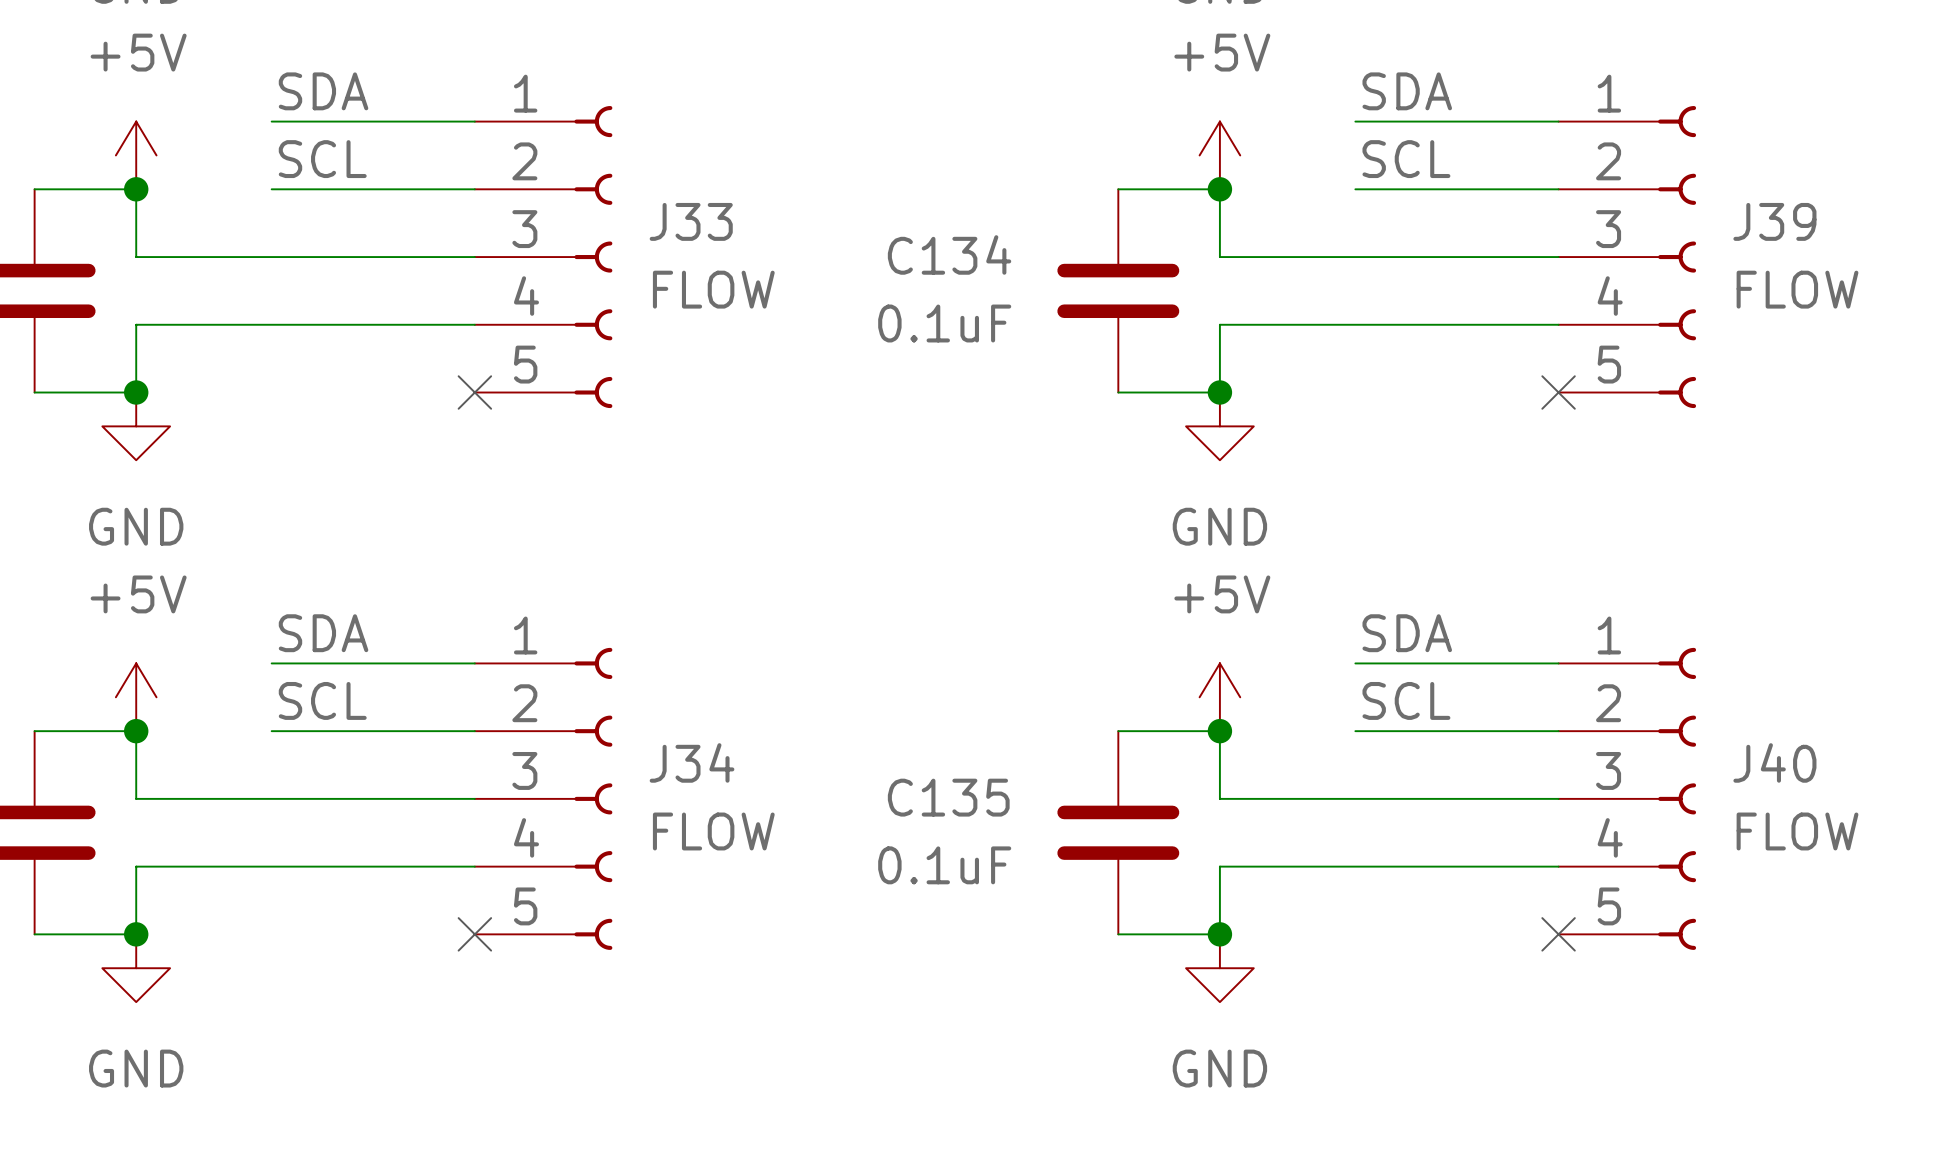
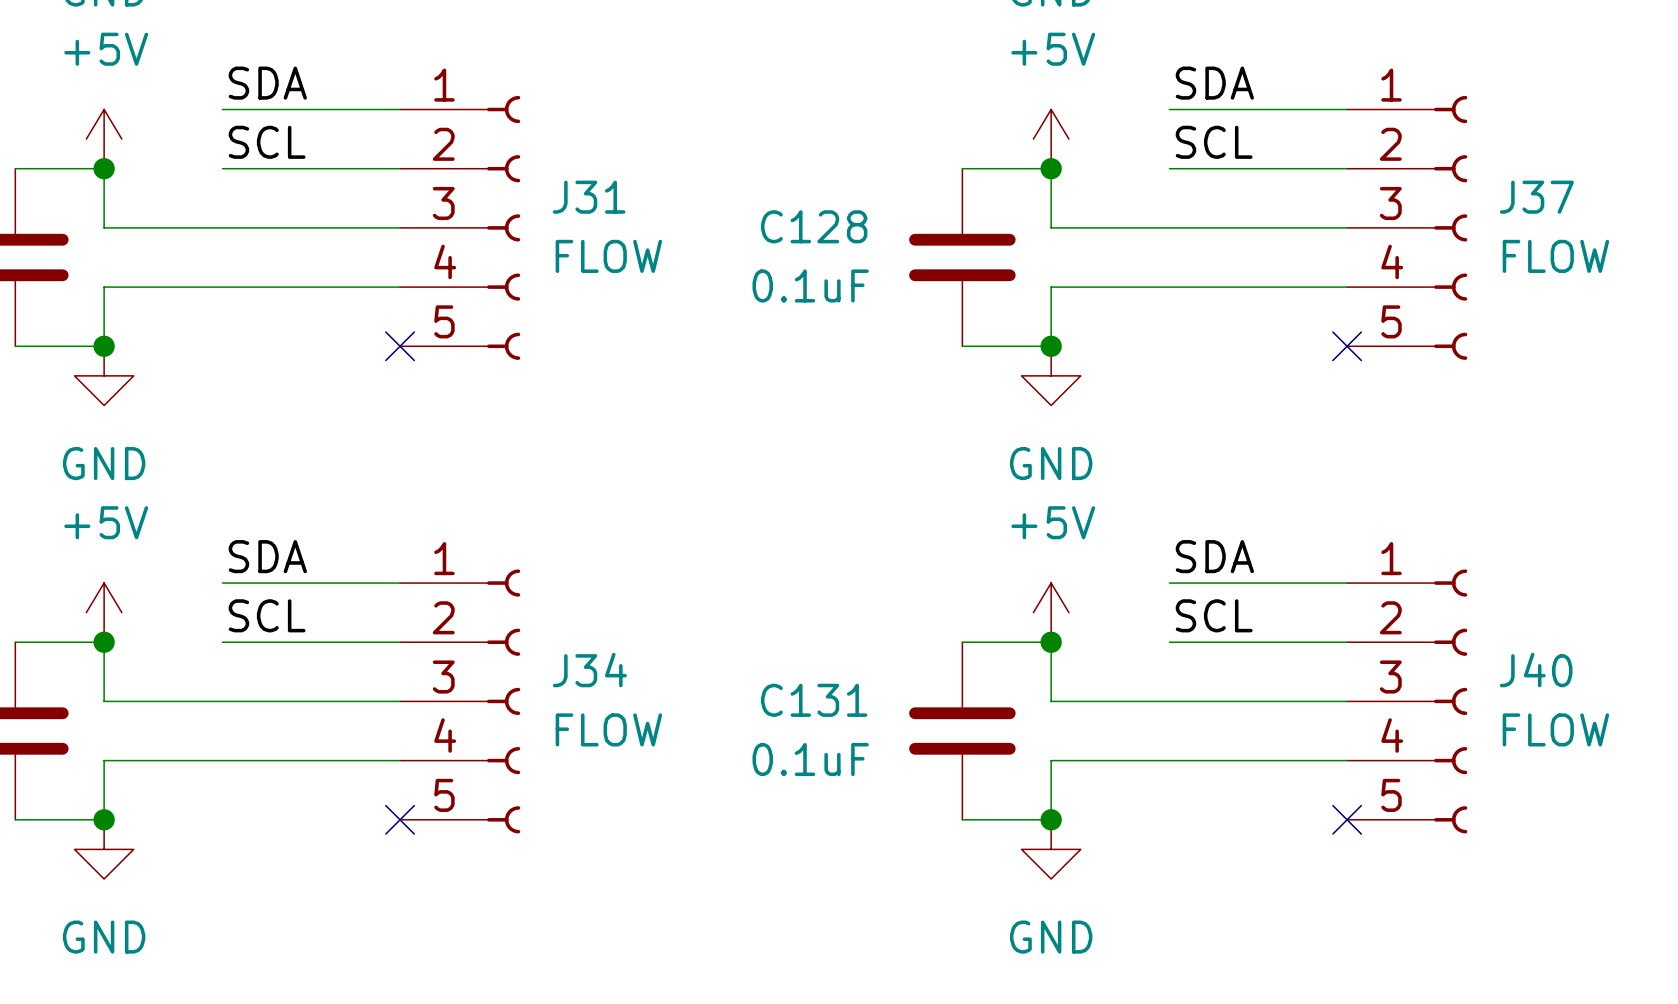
J33 name: J33 (691, 221) -> J31 (589, 197)
J39 name: J39 (1774, 221) -> J37 (1536, 197)
C134 name: C134 (949, 254) -> C128 (814, 226)
C135 name: C135 (948, 797) -> C131 (814, 700)

